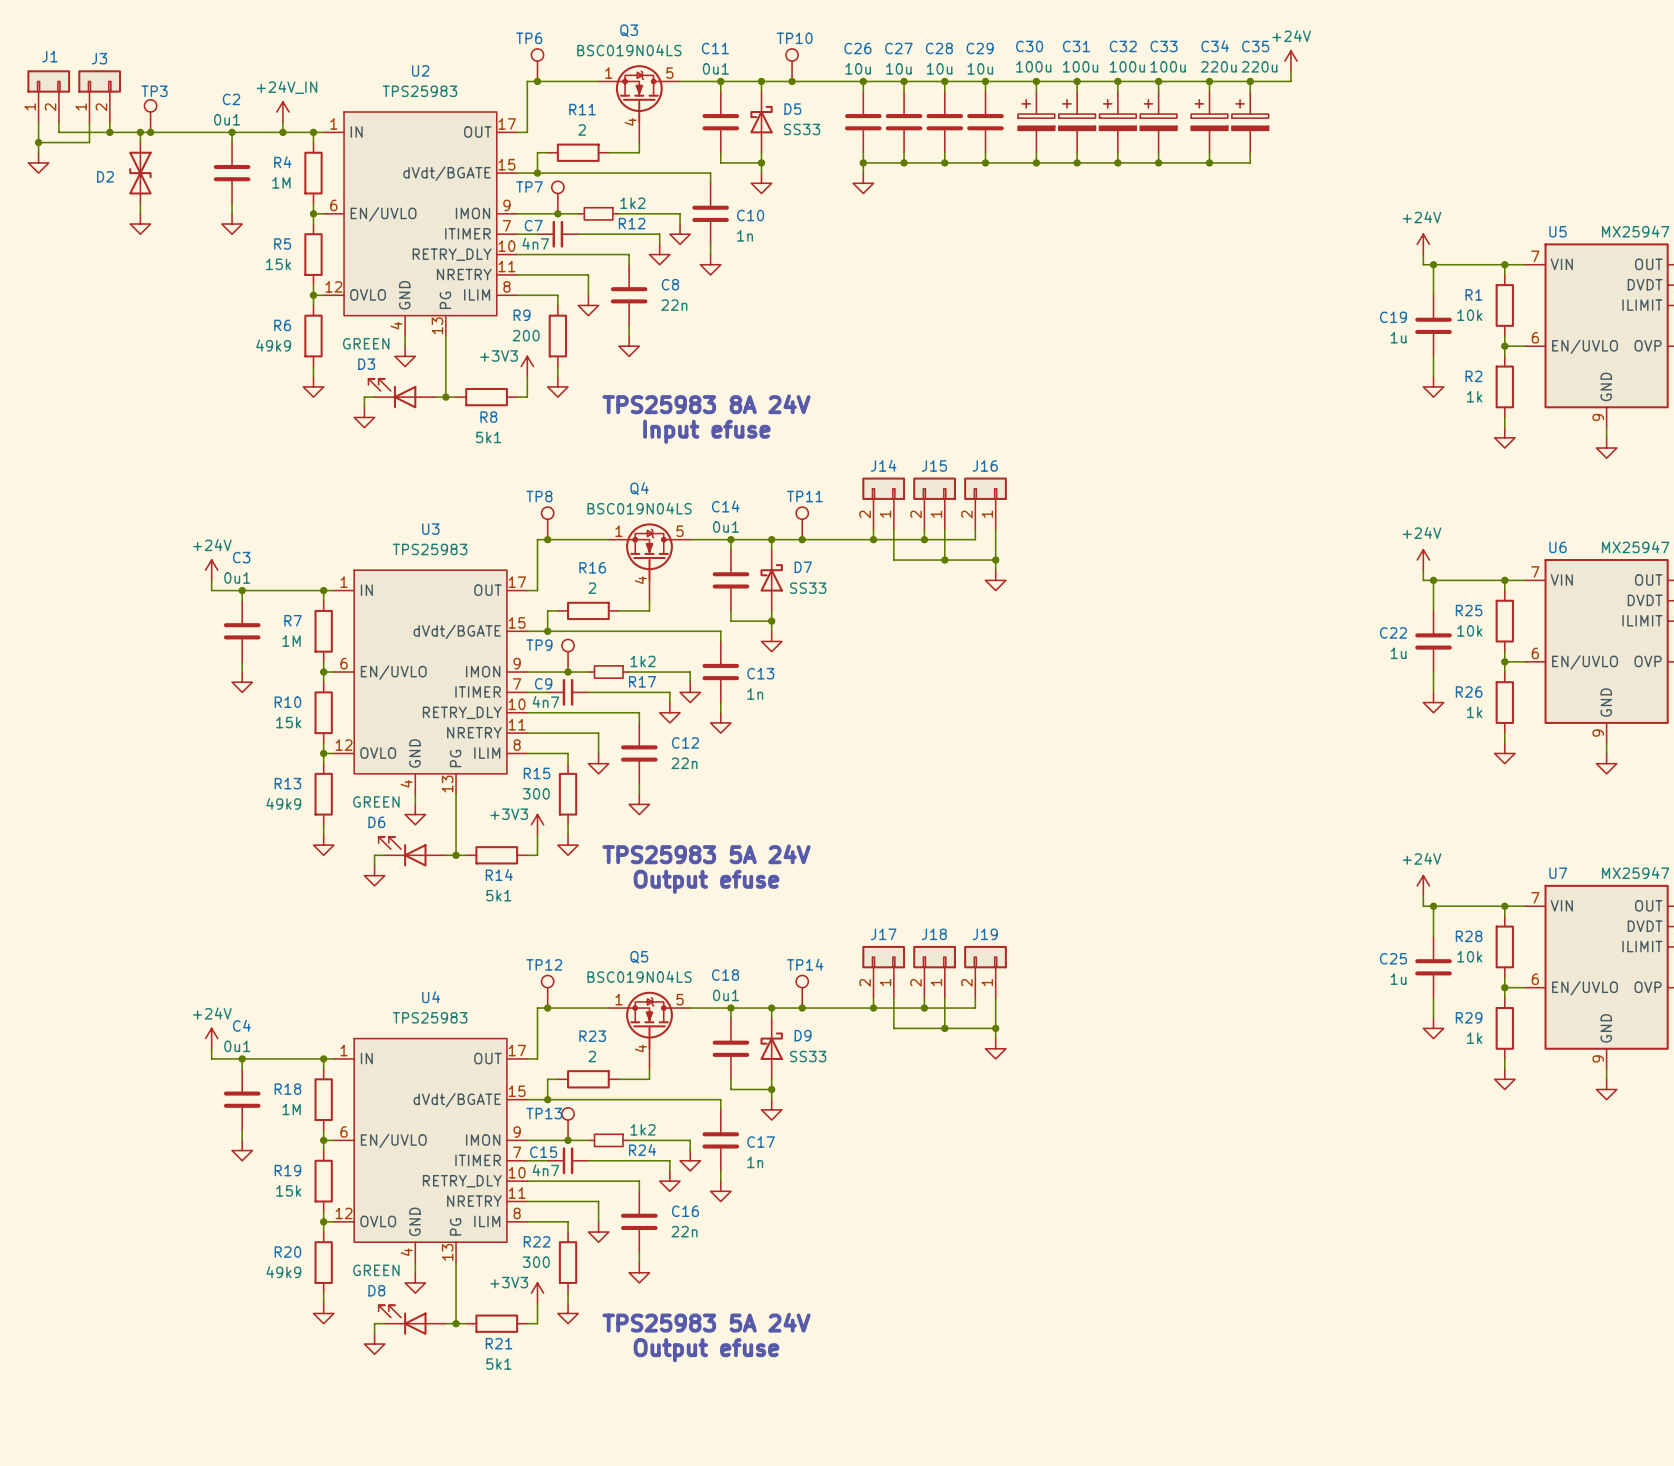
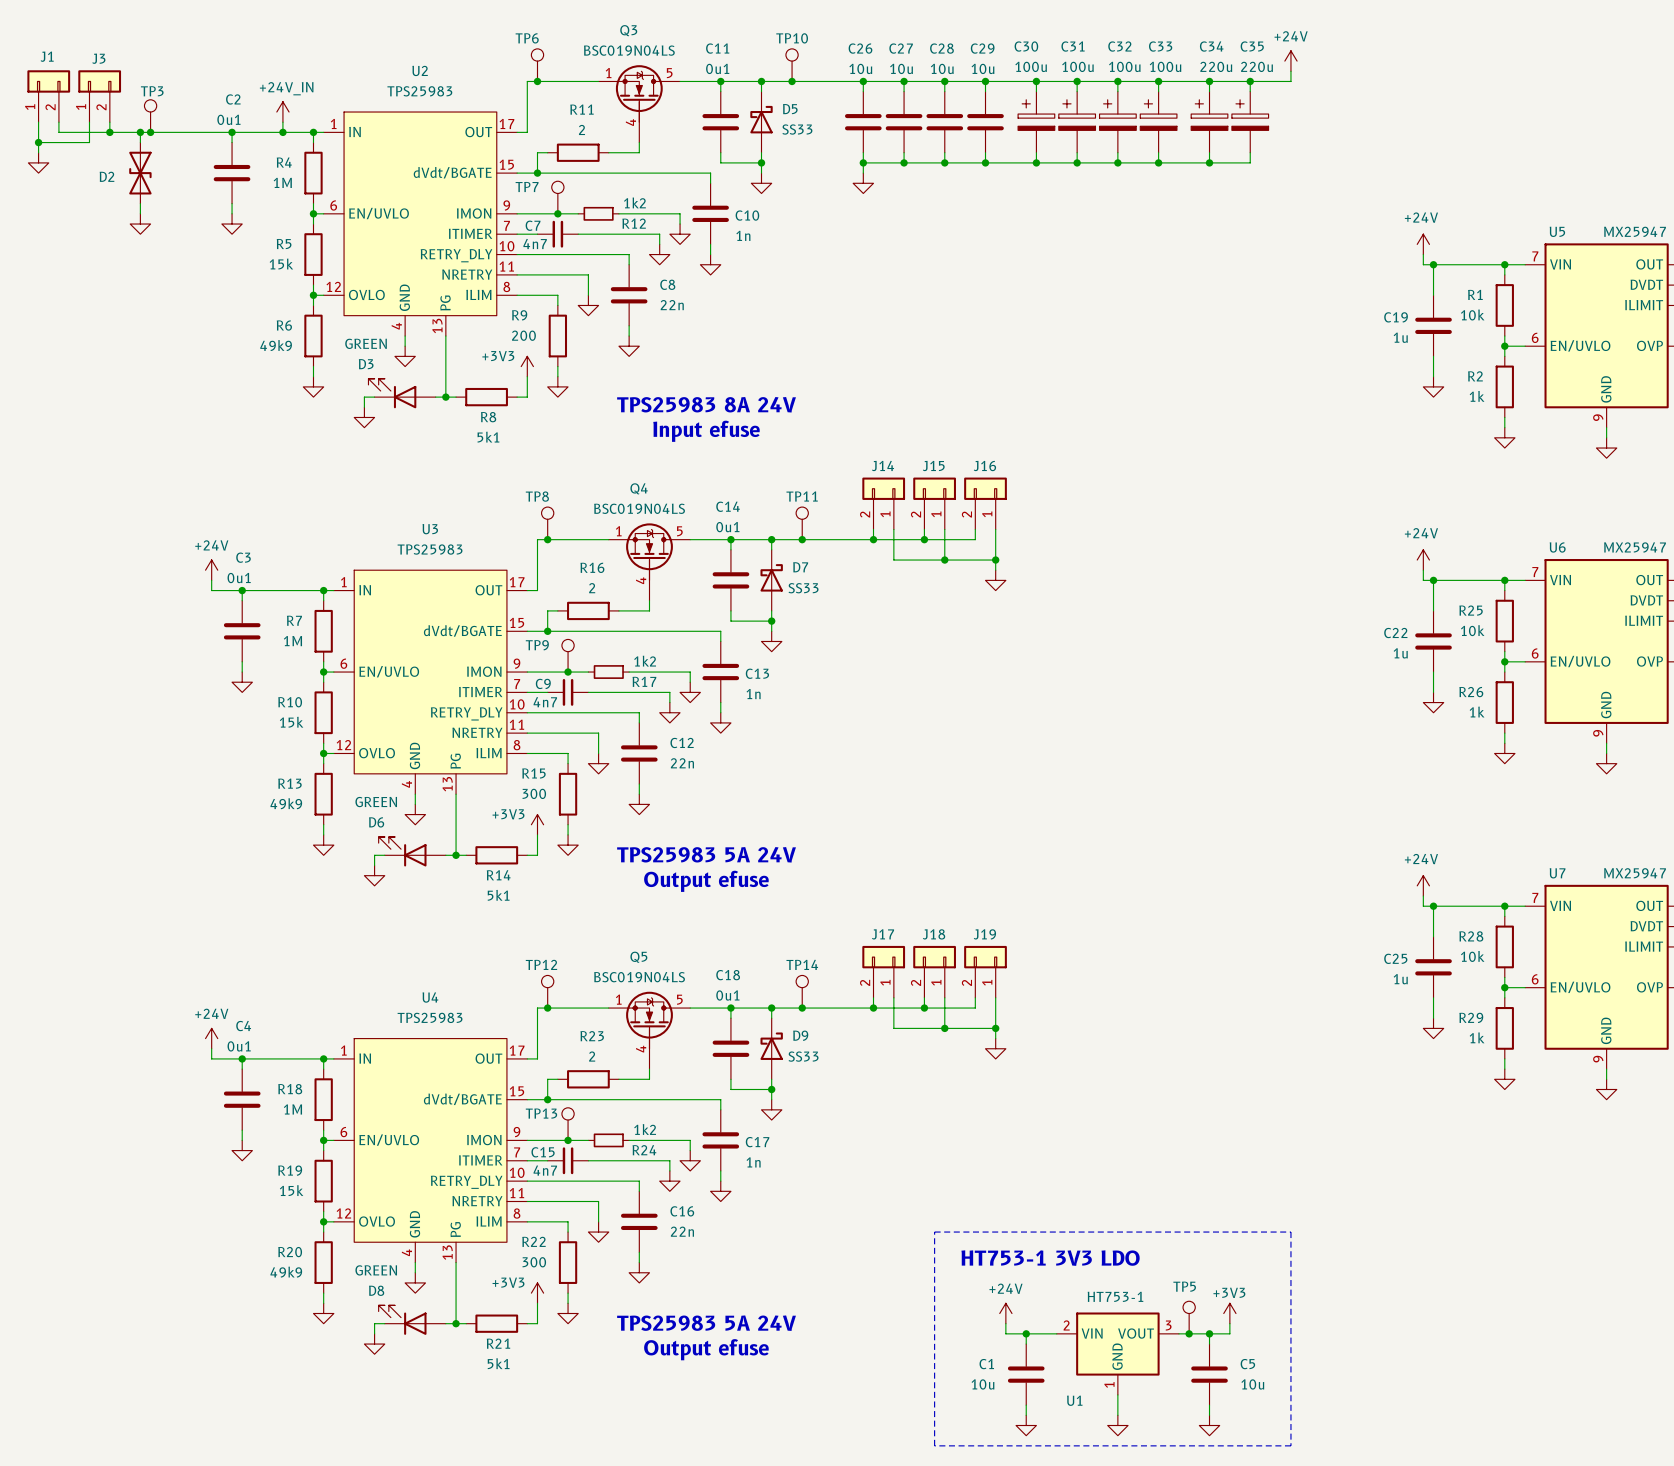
line: none -> (934, 1232) (1290, 1232) (1290, 1445) (934, 1445) (934, 1232)
text: none -> HT753-1 3V3 LDO (1050, 1258)
power symbol: none -> +24V (1005, 1313)
power symbol: none -> +3V3 (1229, 1313)
TP5: none -> (1189, 1317)
wire: none -> (1005, 1323) (1005, 1333) (1056, 1333)
wire: none -> (1229, 1323) (1229, 1333) (1178, 1333)
wire: none -> (1026, 1333) (1026, 1344)
junction: none -> (1026, 1333)
junction: none -> (1189, 1333)
wire: none -> (1209, 1333) (1209, 1344)
junction: none -> (1209, 1333)
U1: none -> HT753-1 (1117, 1353)
C1: none -> 10u (1026, 1374)
C5: none -> 10u (1209, 1374)
wire: none -> (1117, 1394) (1117, 1415)
wire: none -> (1026, 1405) (1026, 1415)
wire: none -> (1209, 1405) (1209, 1415)
power symbol: none -> (1026, 1425)
power symbol: none -> (1117, 1425)
power symbol: none -> (1209, 1425)

